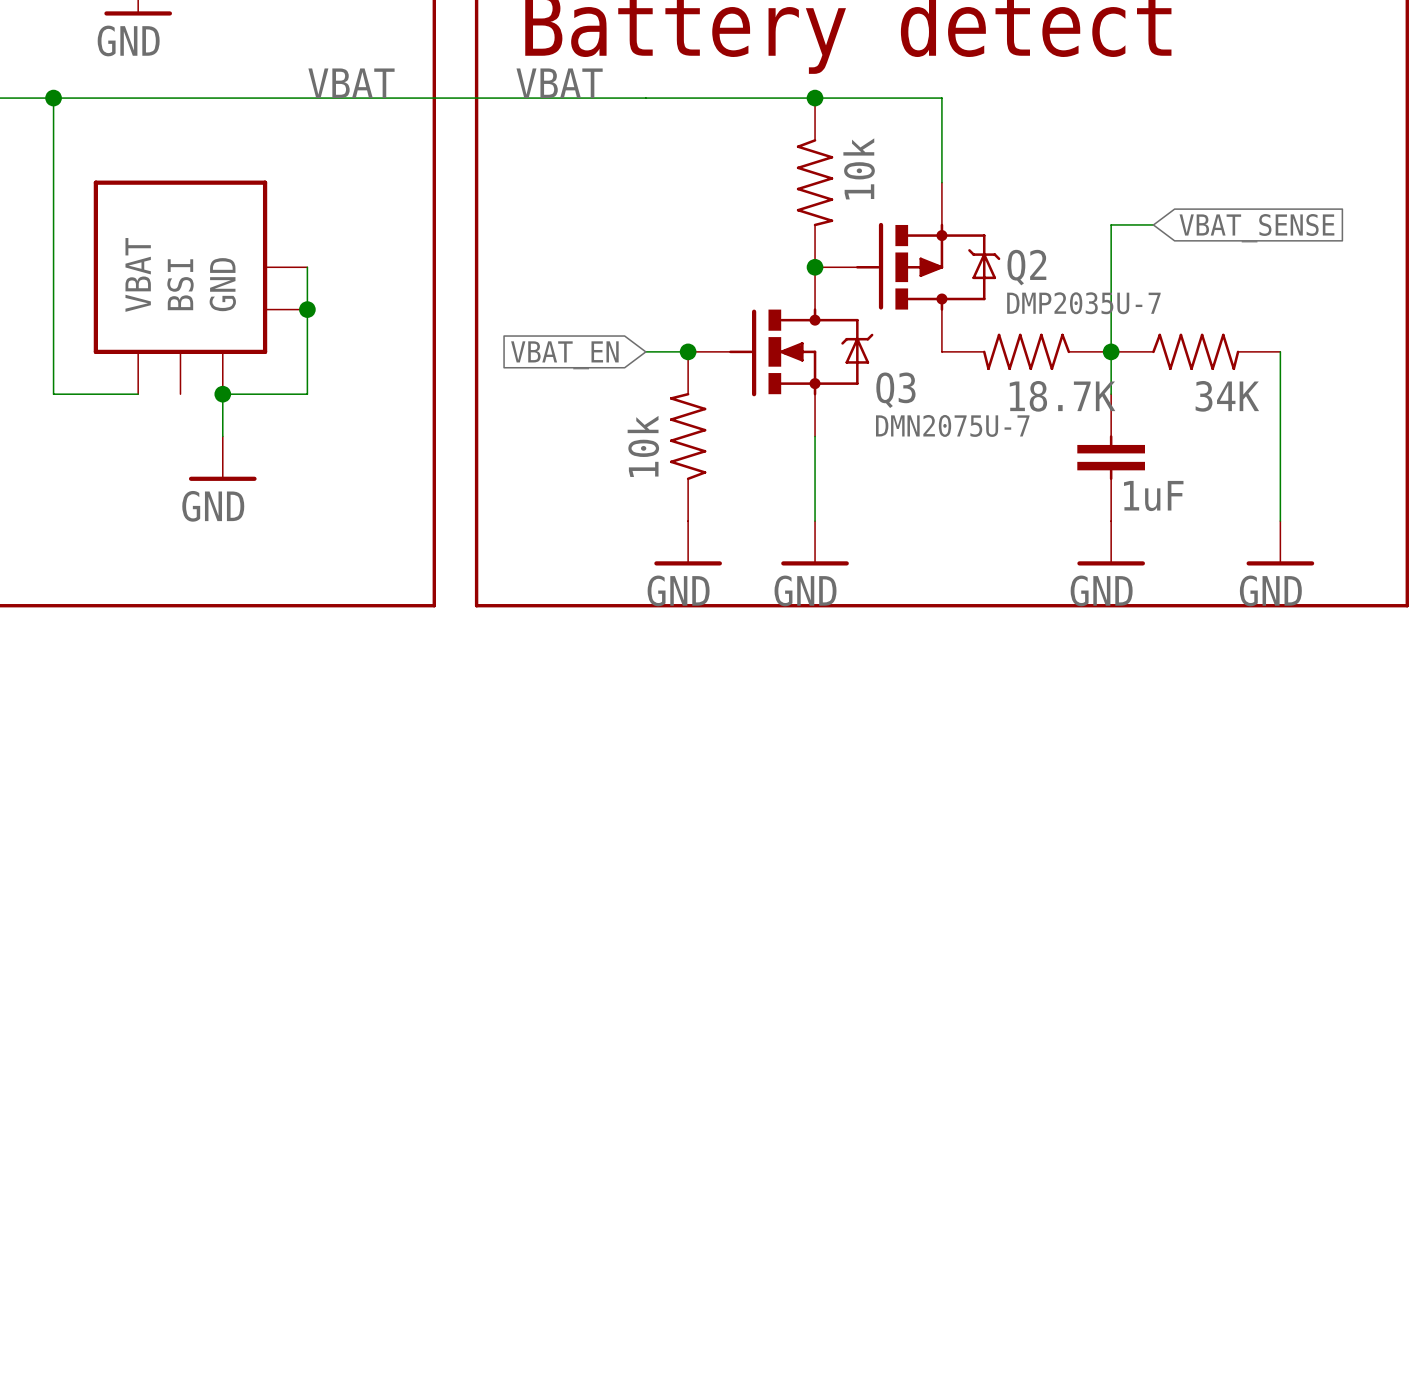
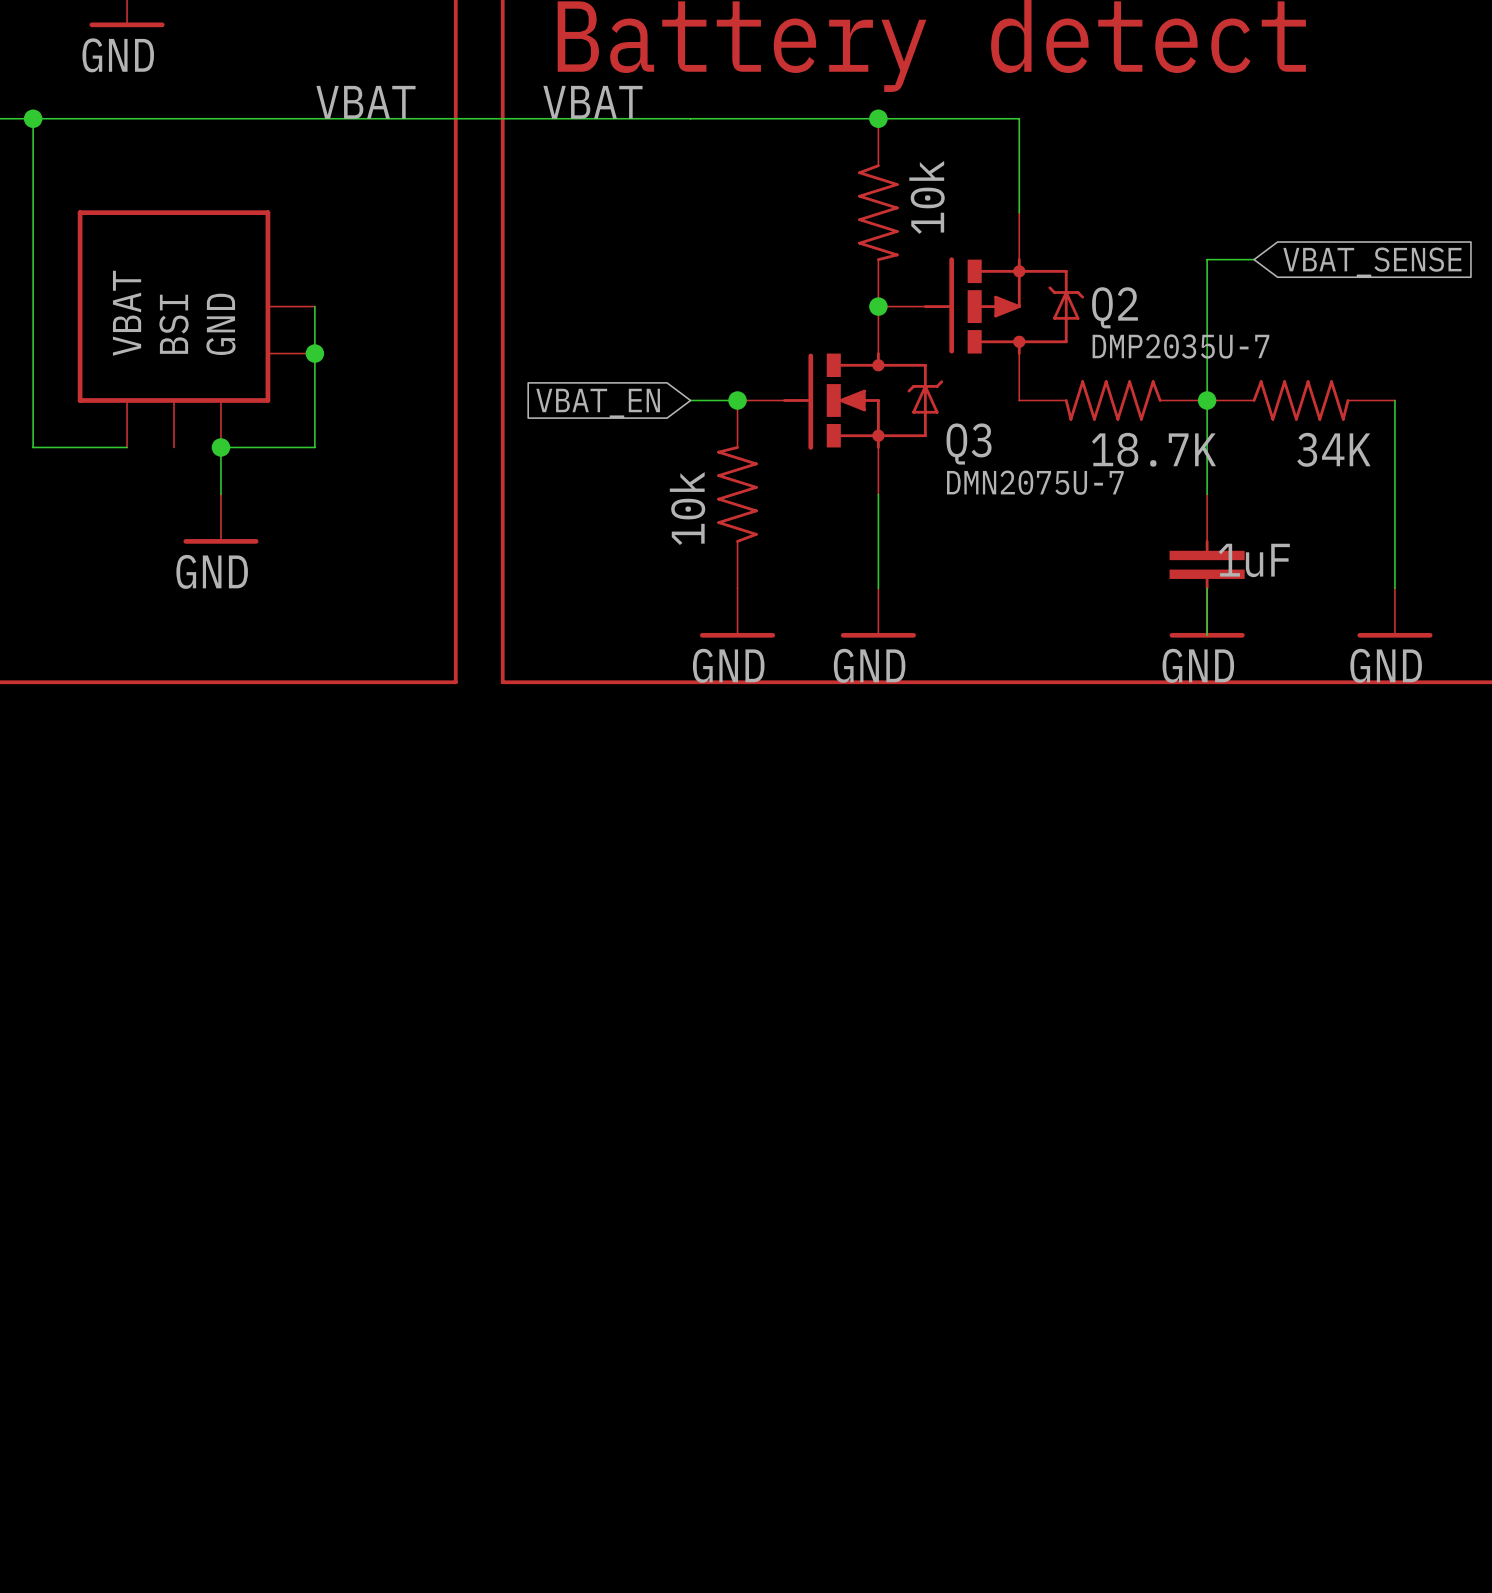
part position: (1111, 457) -> (1207, 564)

